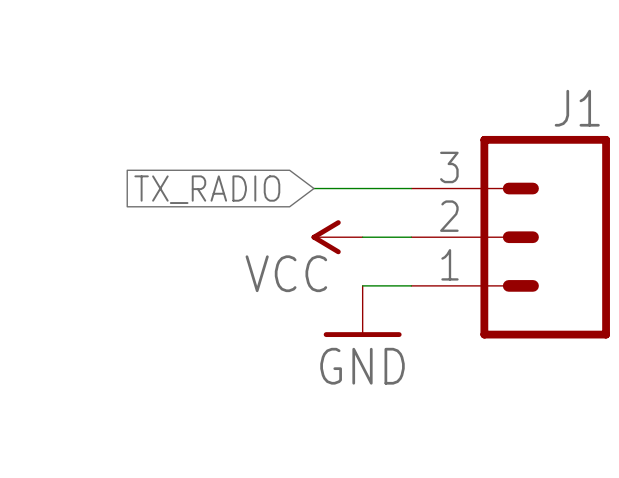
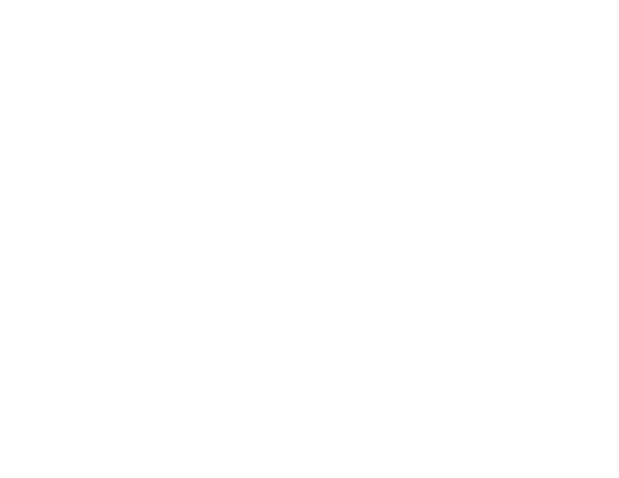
wire: (313, 188) (411, 188) -> none
global label: TX_RADIO (207, 189) -> none
power symbol: VCC (337, 237) -> none
wire: (362, 237) (411, 237) -> none
J1: (510, 237) -> none
wire: (362, 285) (411, 285) -> none
power symbol: GND (362, 311) -> none

